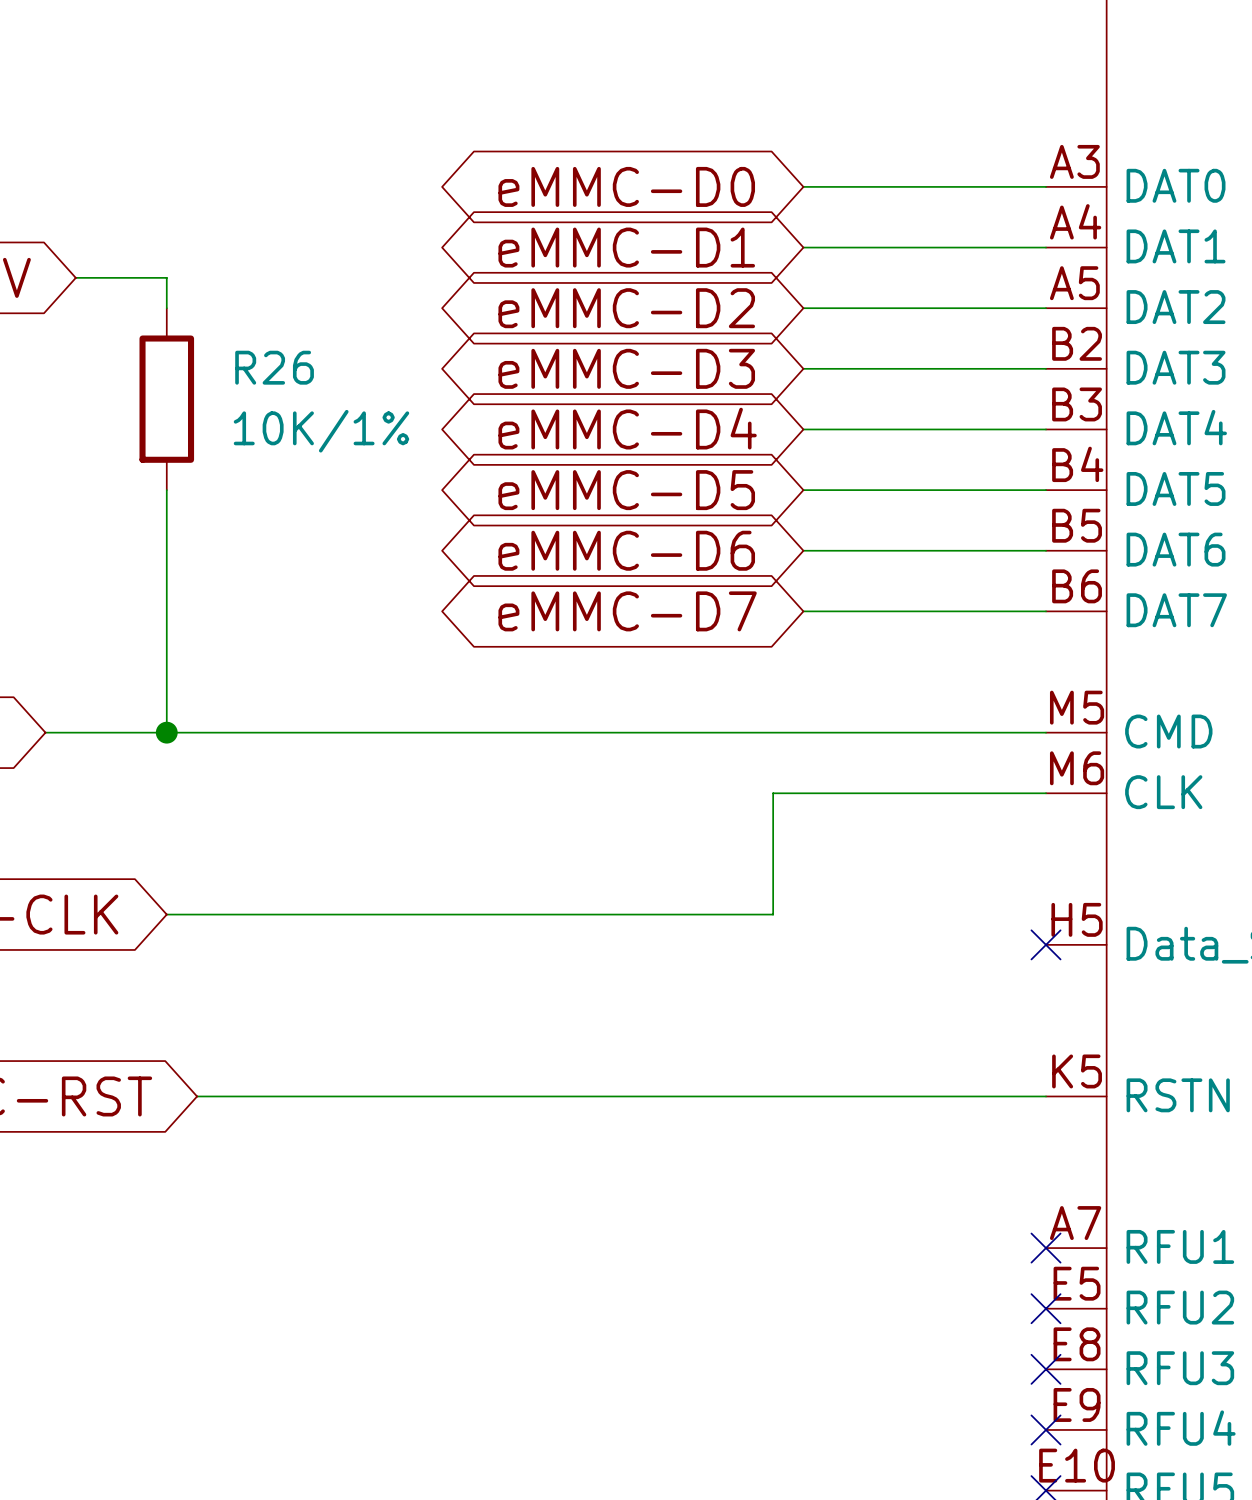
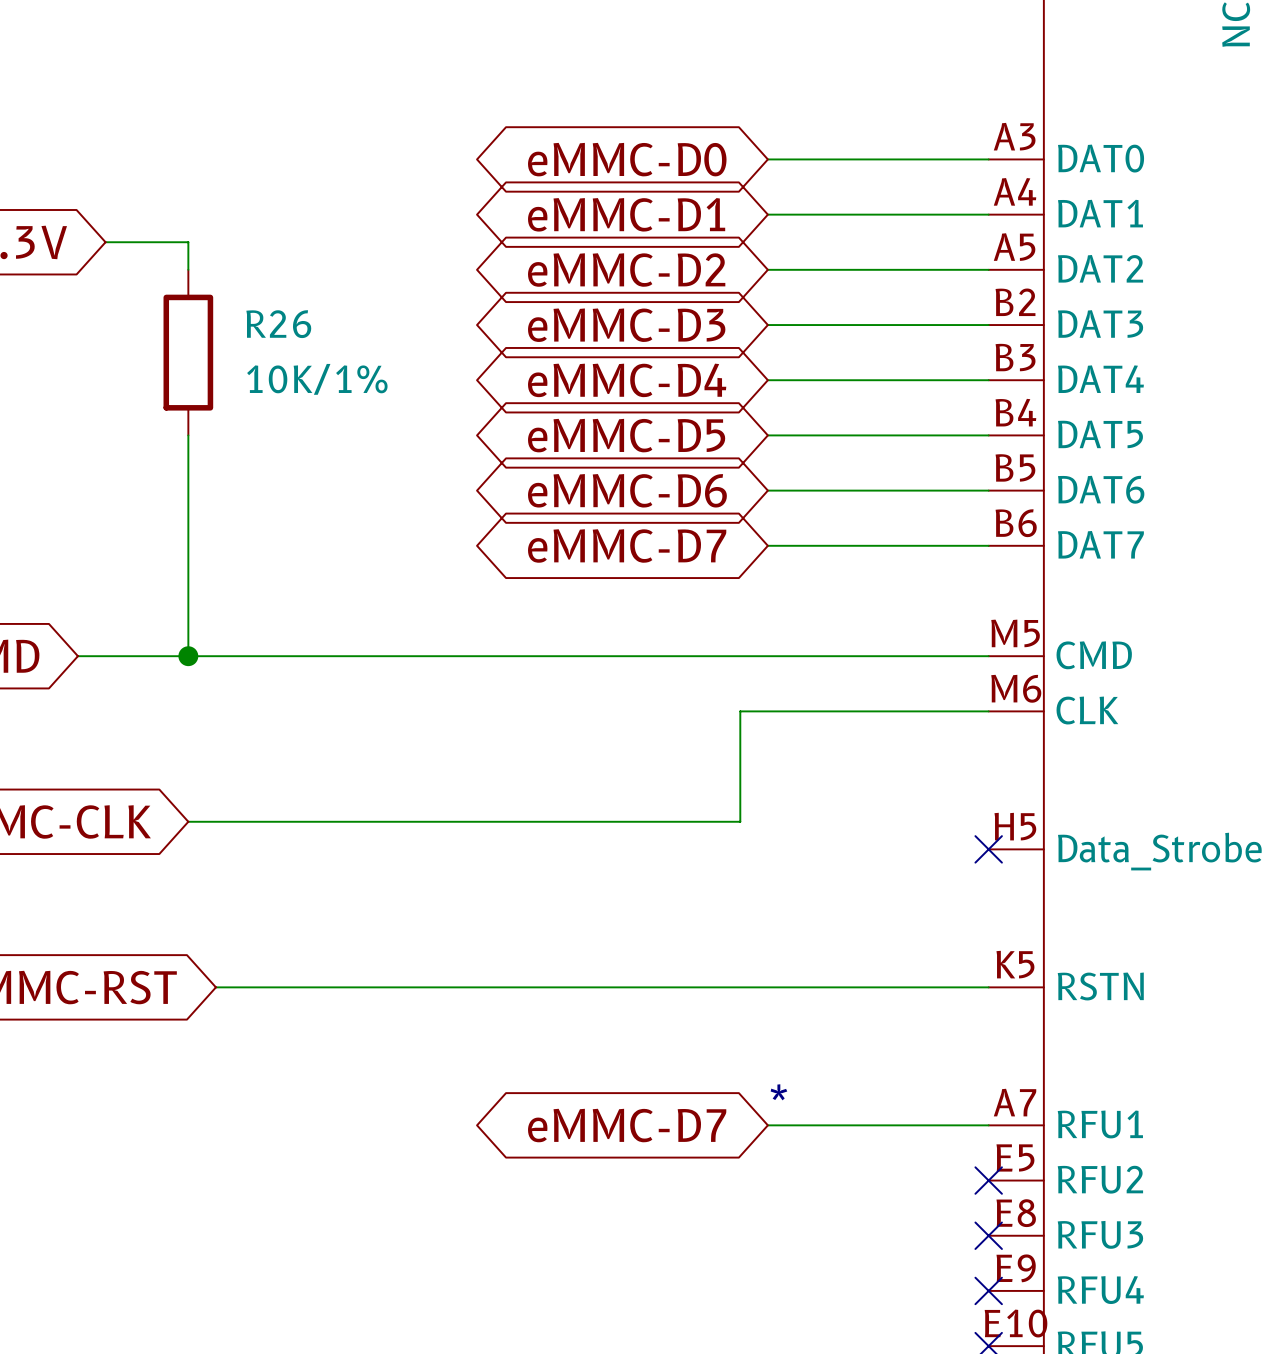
text: none -> * (778, 1092)
global label: none -> eMMC-D7 (627, 1125)
wire: none -> (767, 1125) (988, 1125)
no-connect mark: (1046, 1248) -> none

